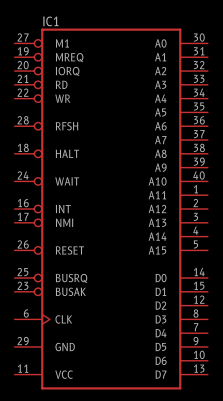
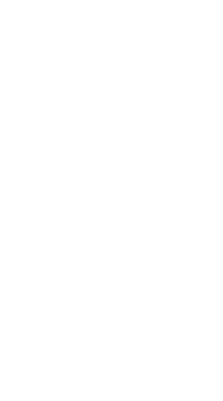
IC1: (111, 209) -> none

